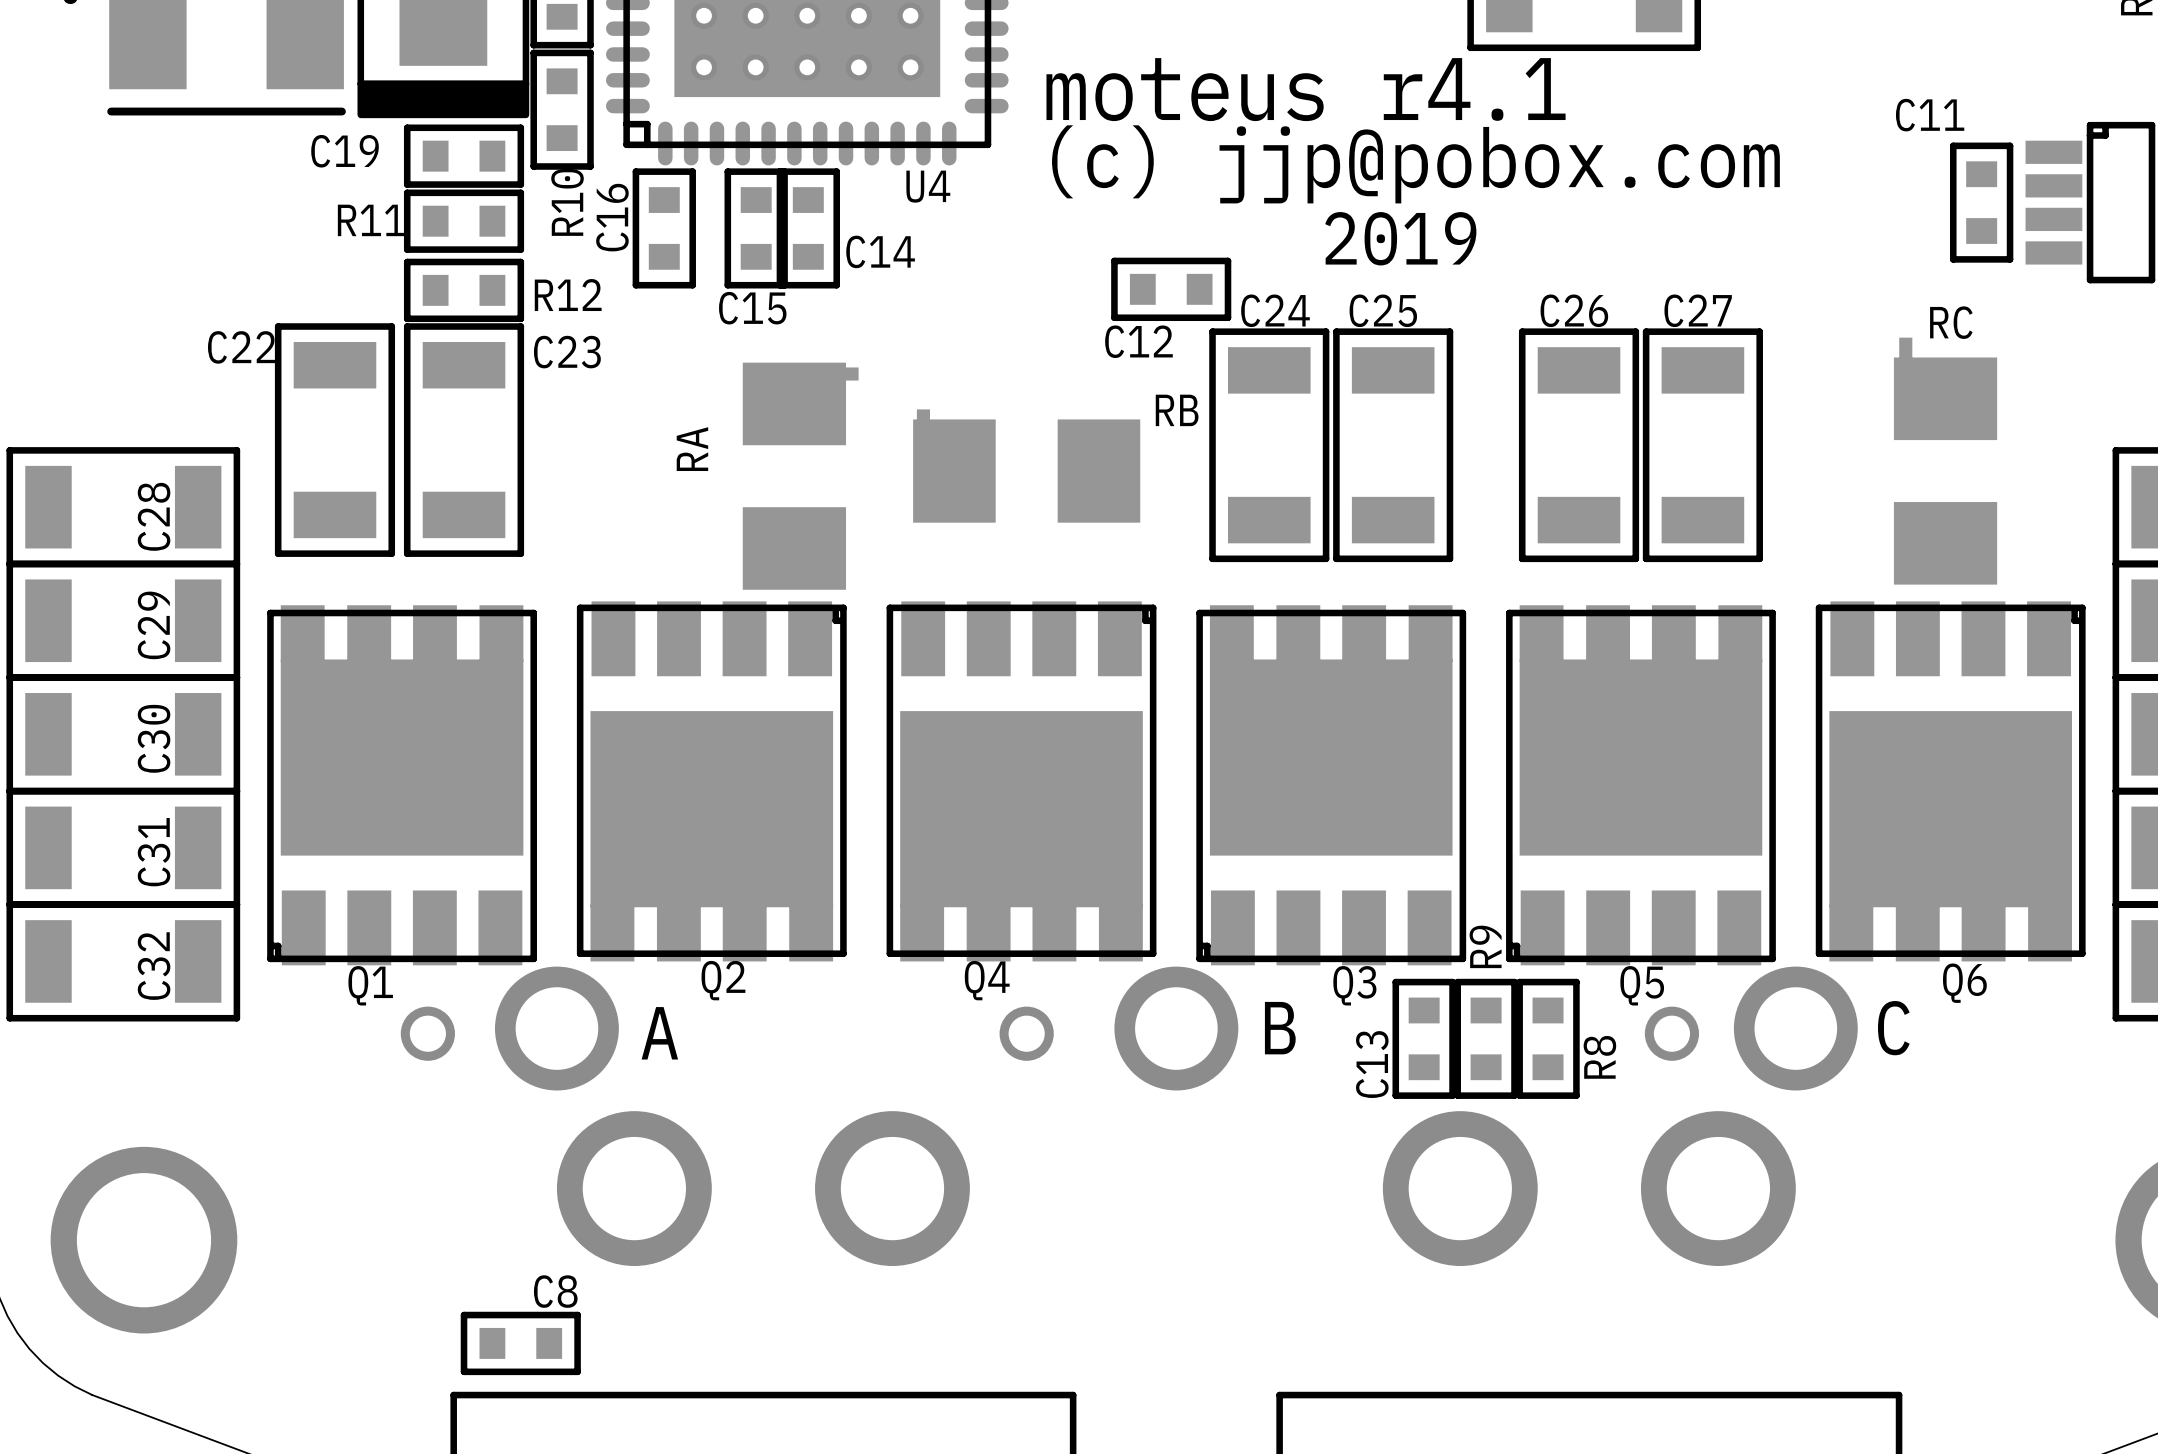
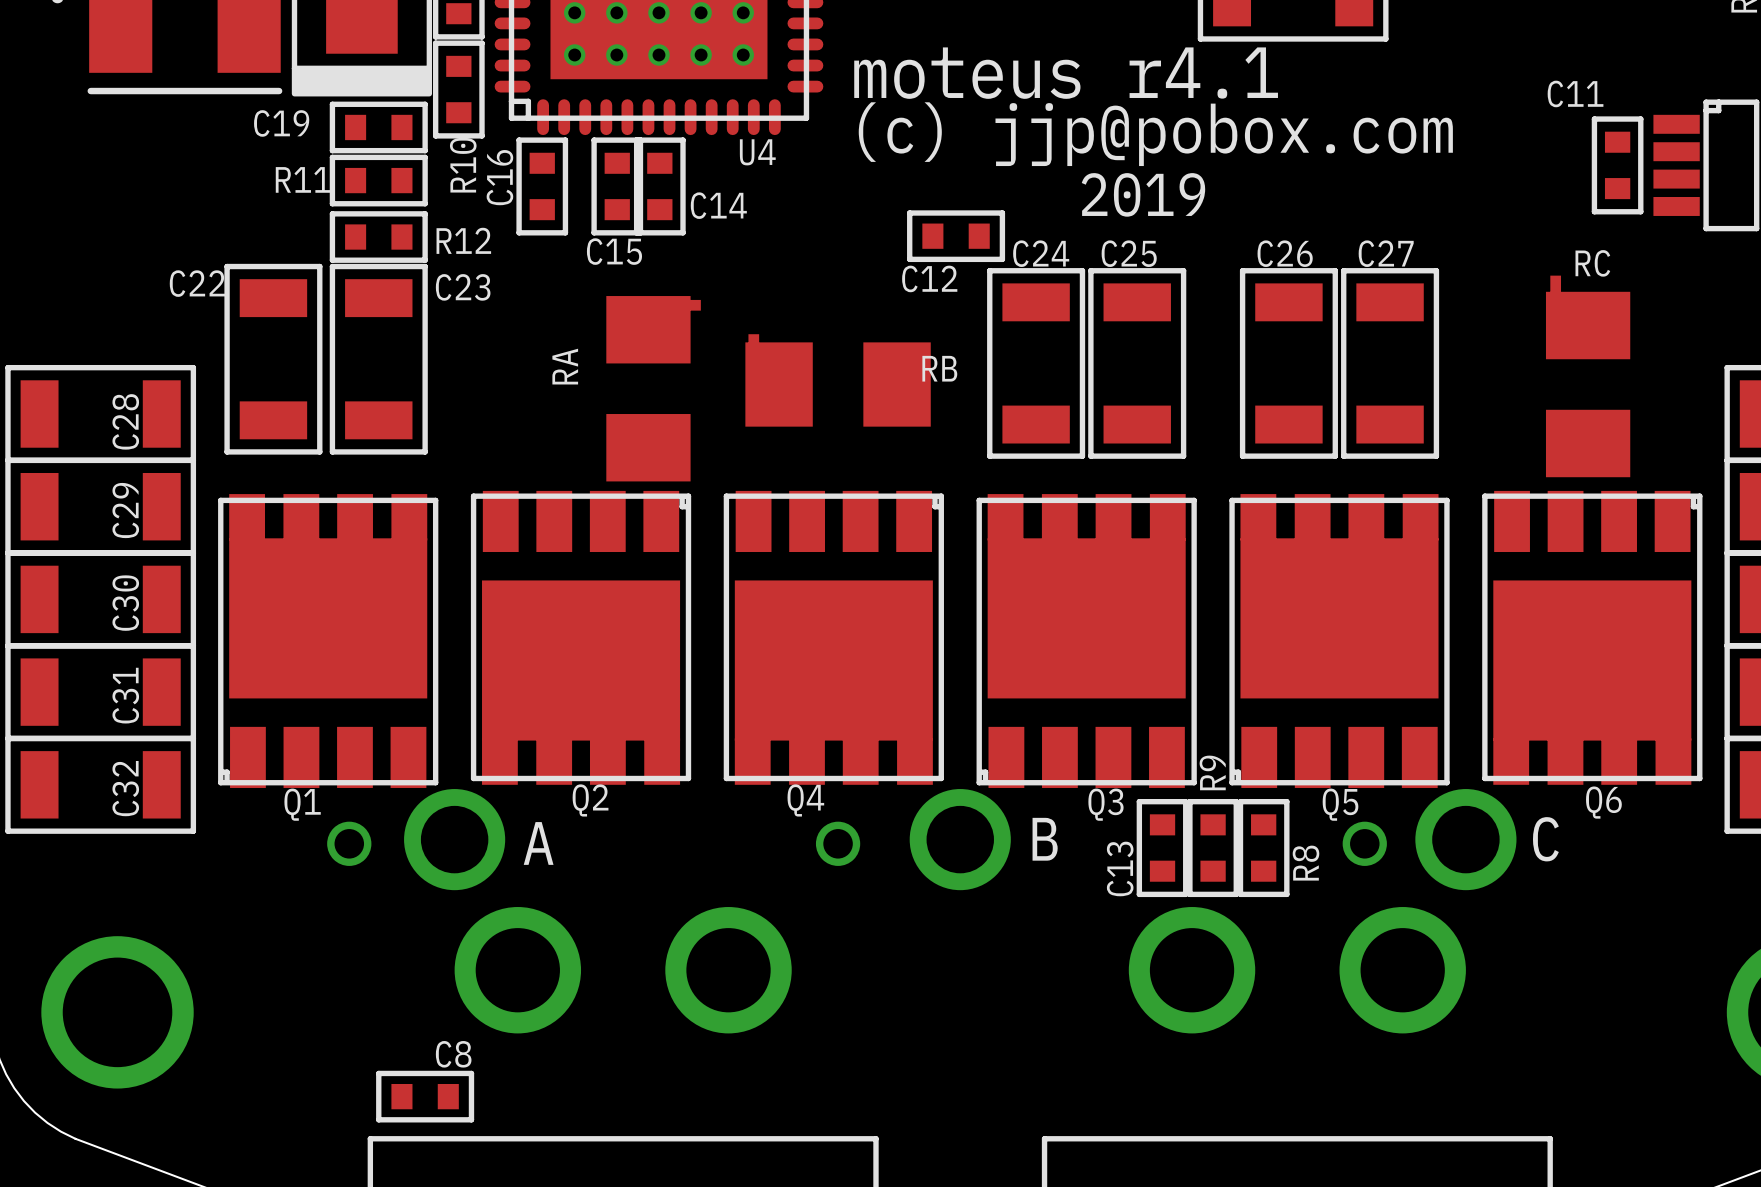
RB name position: RB (1177, 410) -> RB (939, 368)

